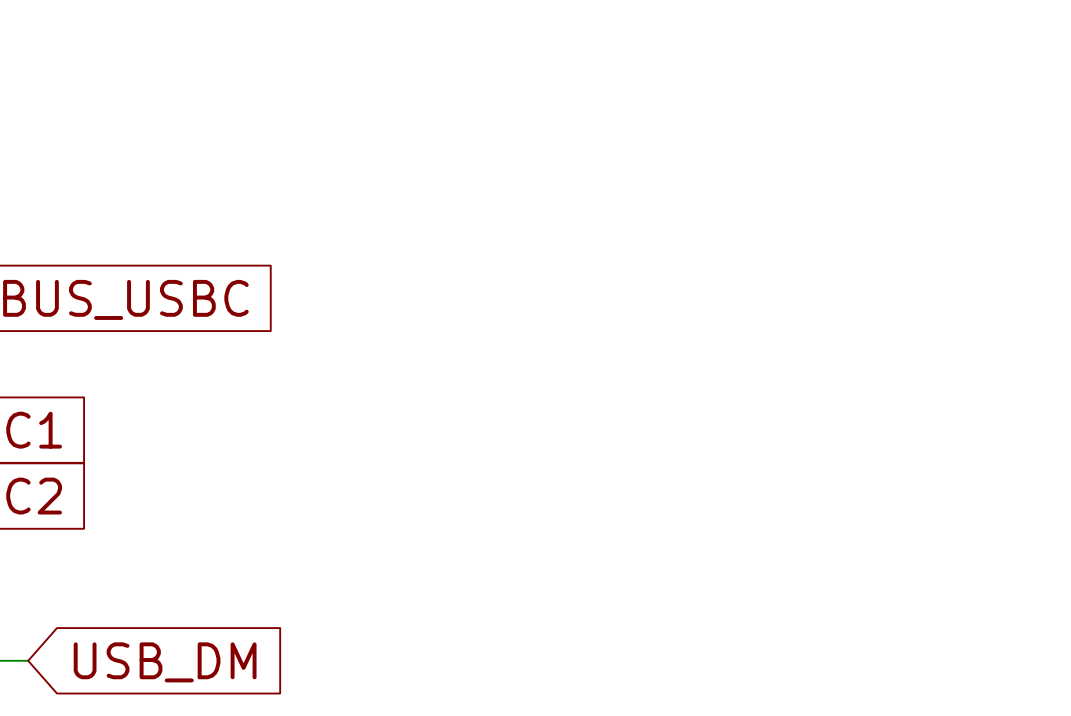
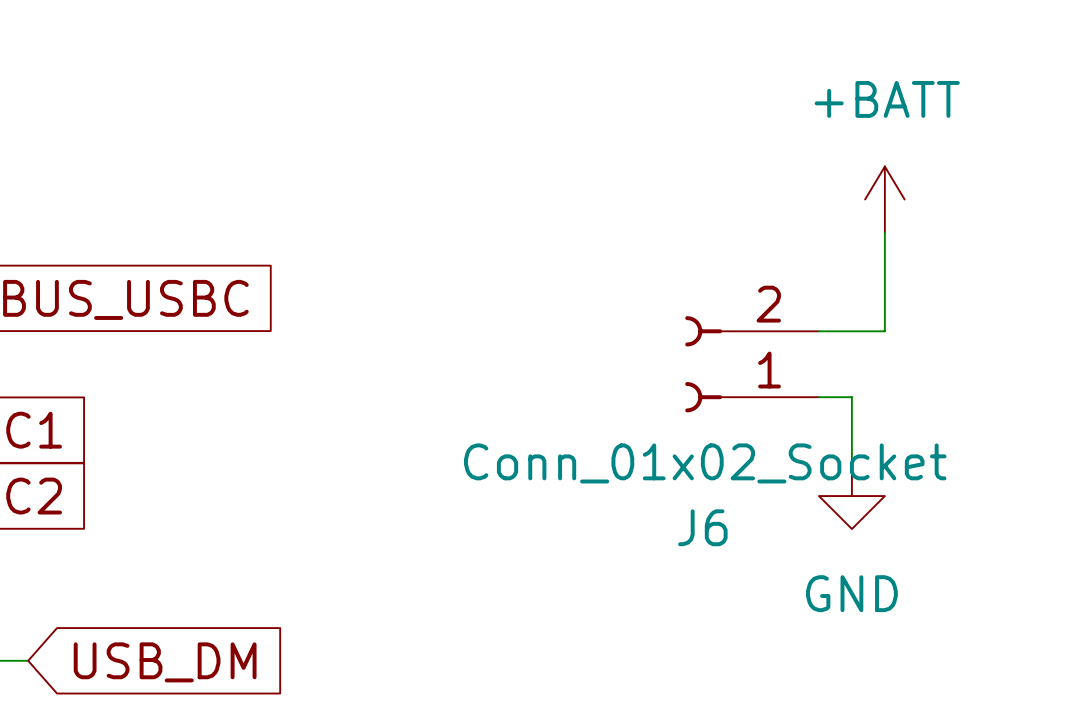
power symbol: none -> +BATT (884, 199)
wire: none -> (884, 232) (884, 331) (818, 331)
J6: none -> Conn_01x02_Socket (752, 364)
wire: none -> (818, 397) (851, 397) (851, 463)
power symbol: none -> GND (851, 496)

